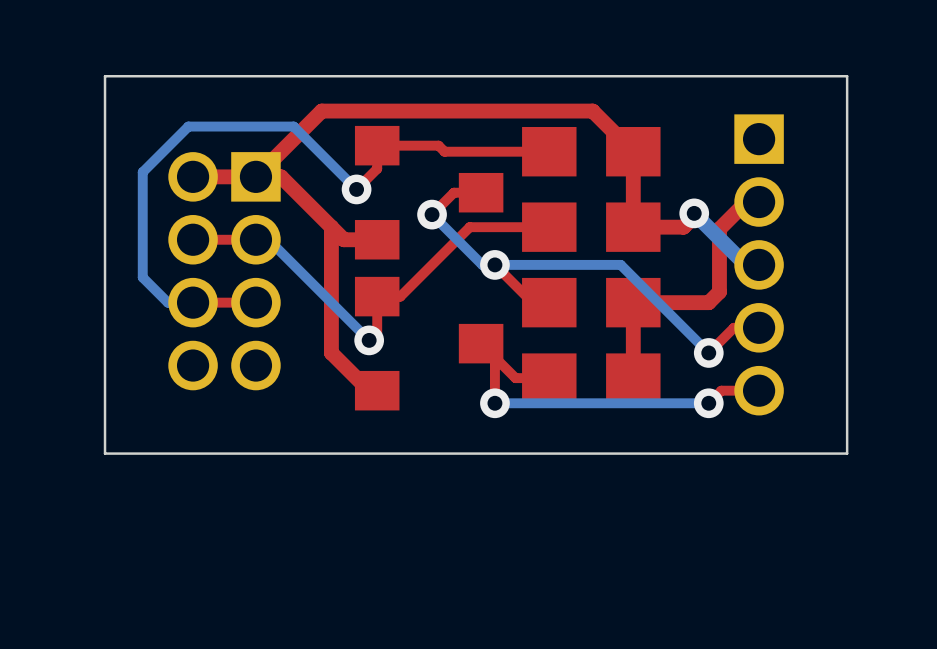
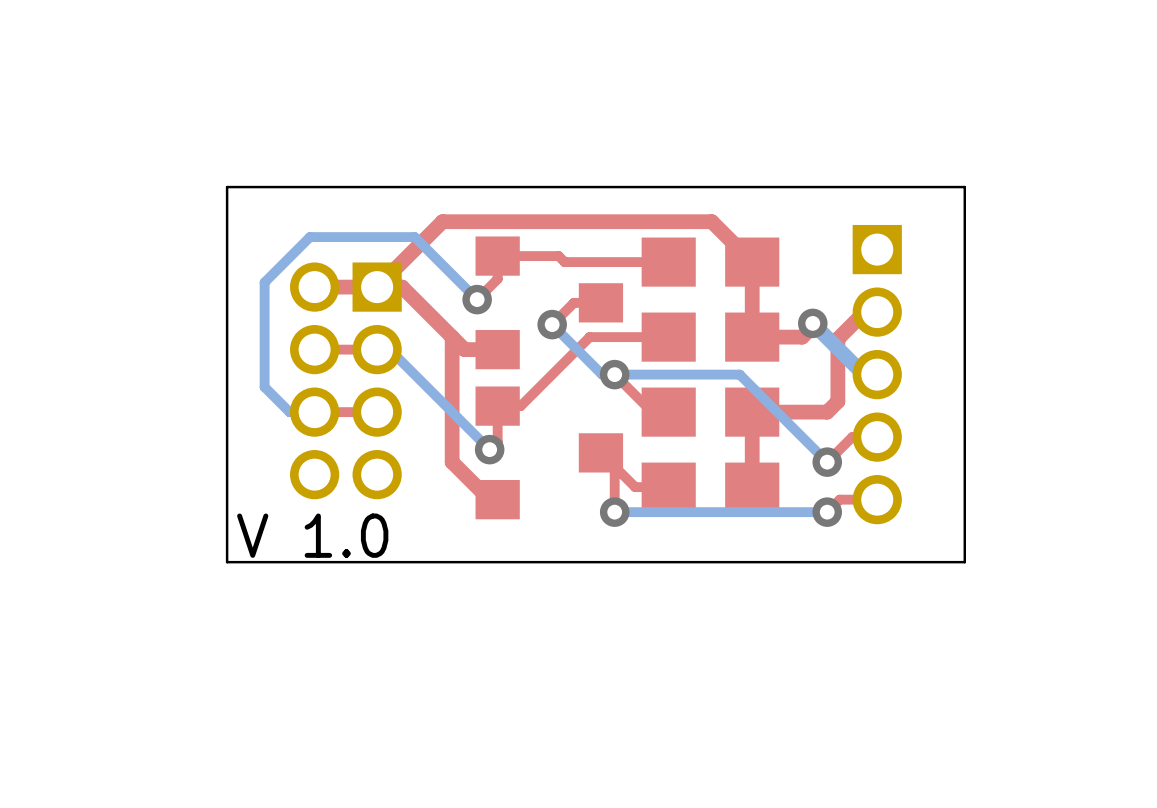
text: none -> V 1.0 (312, 535)

